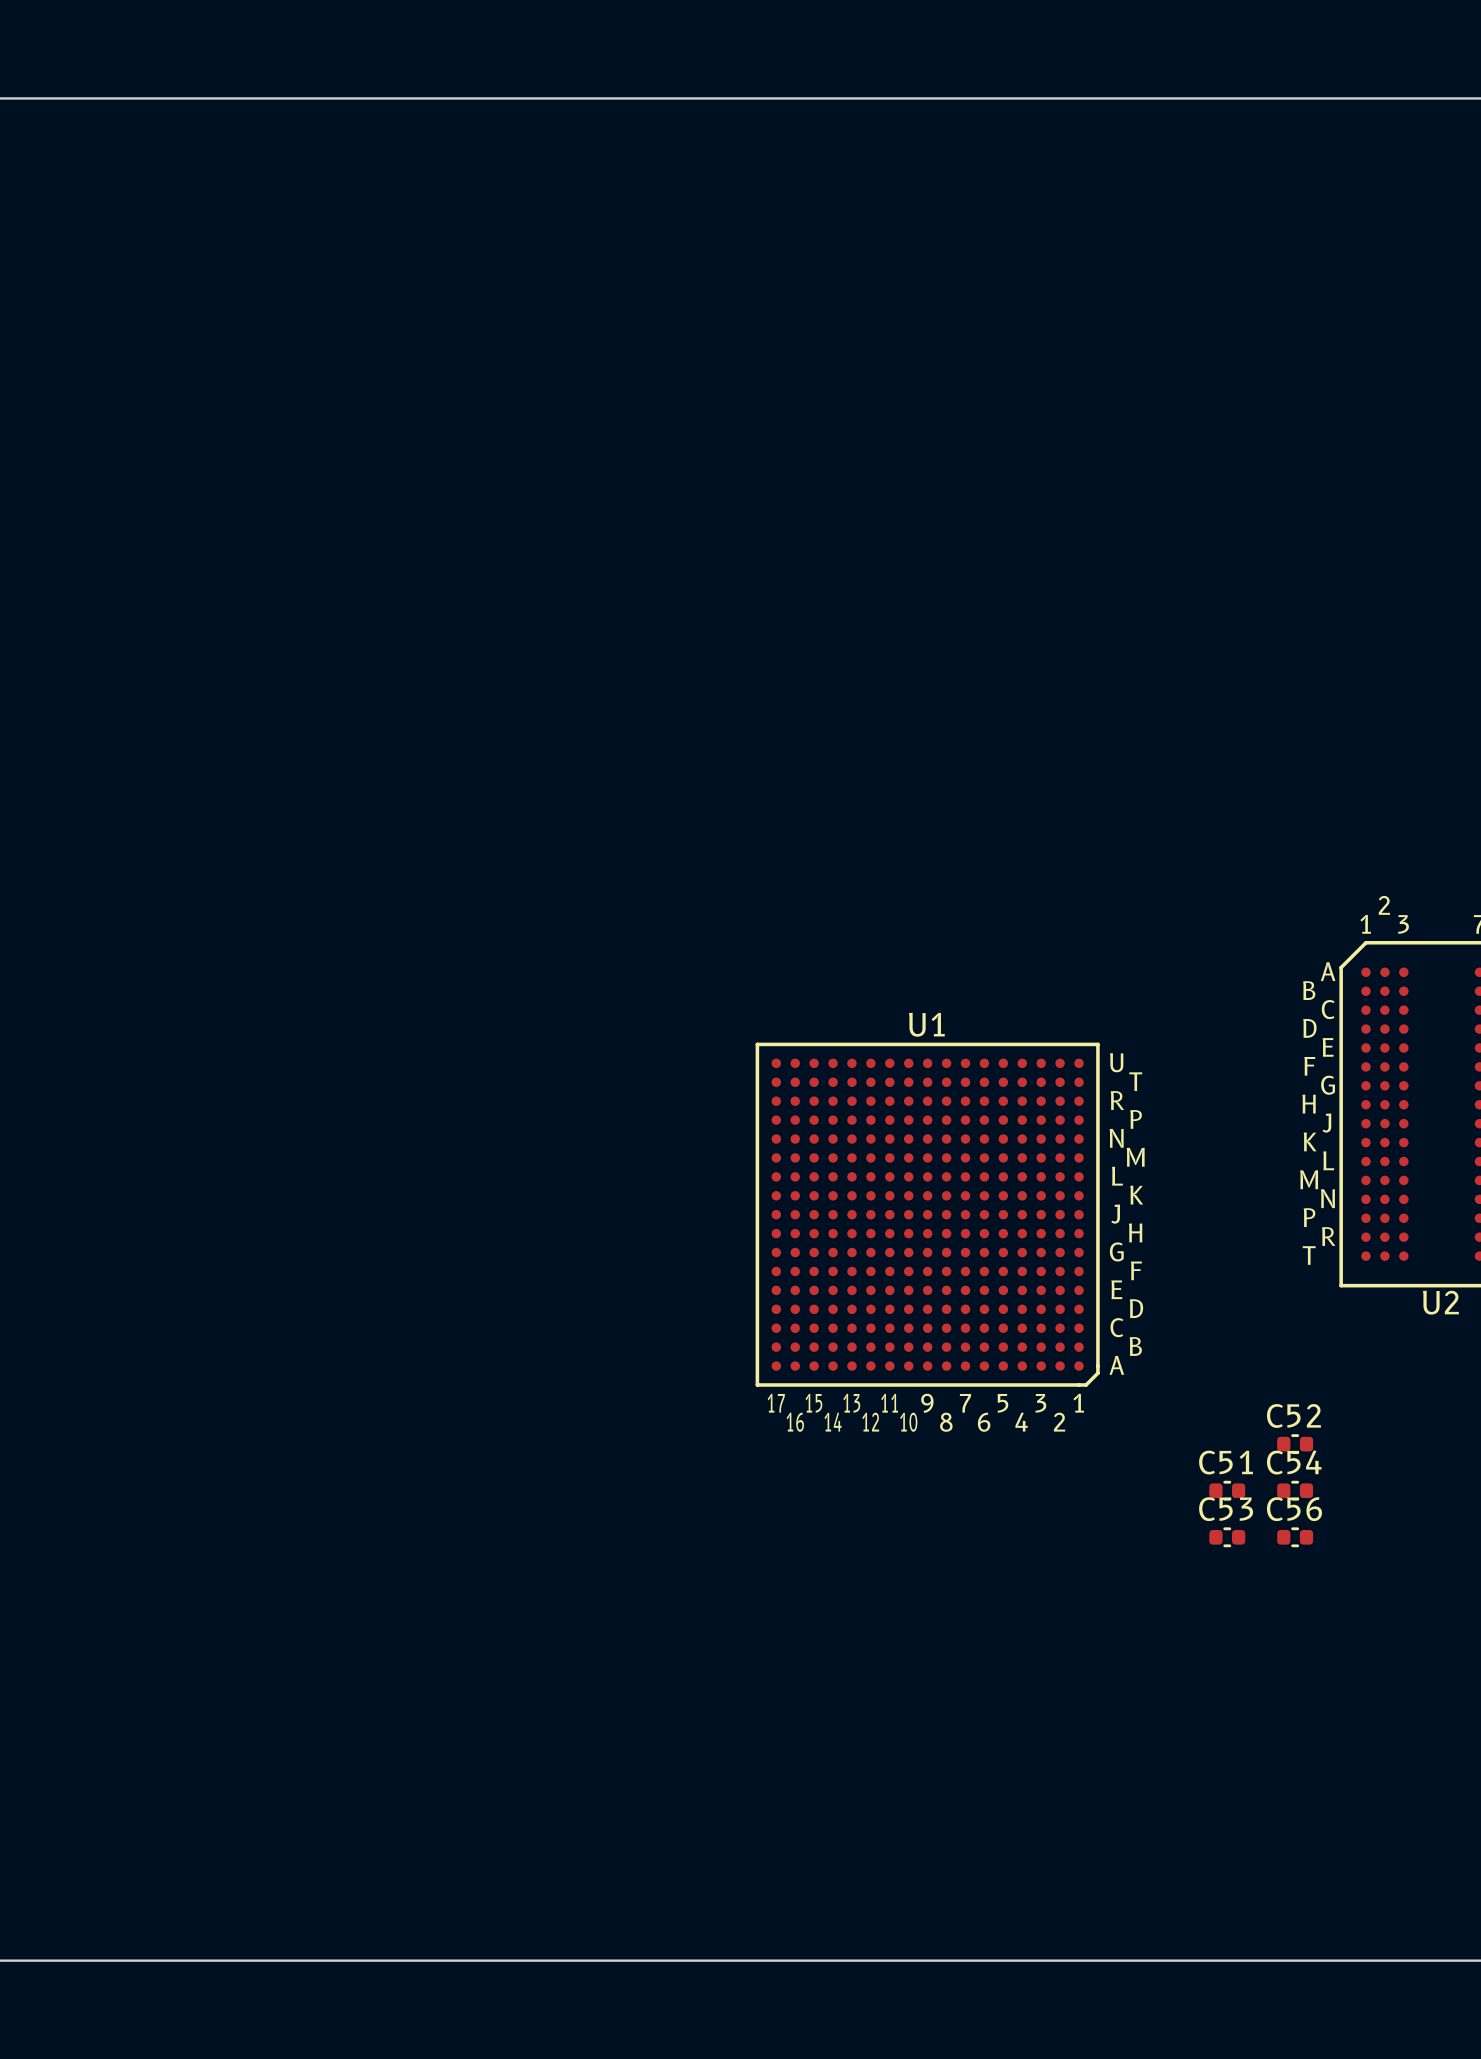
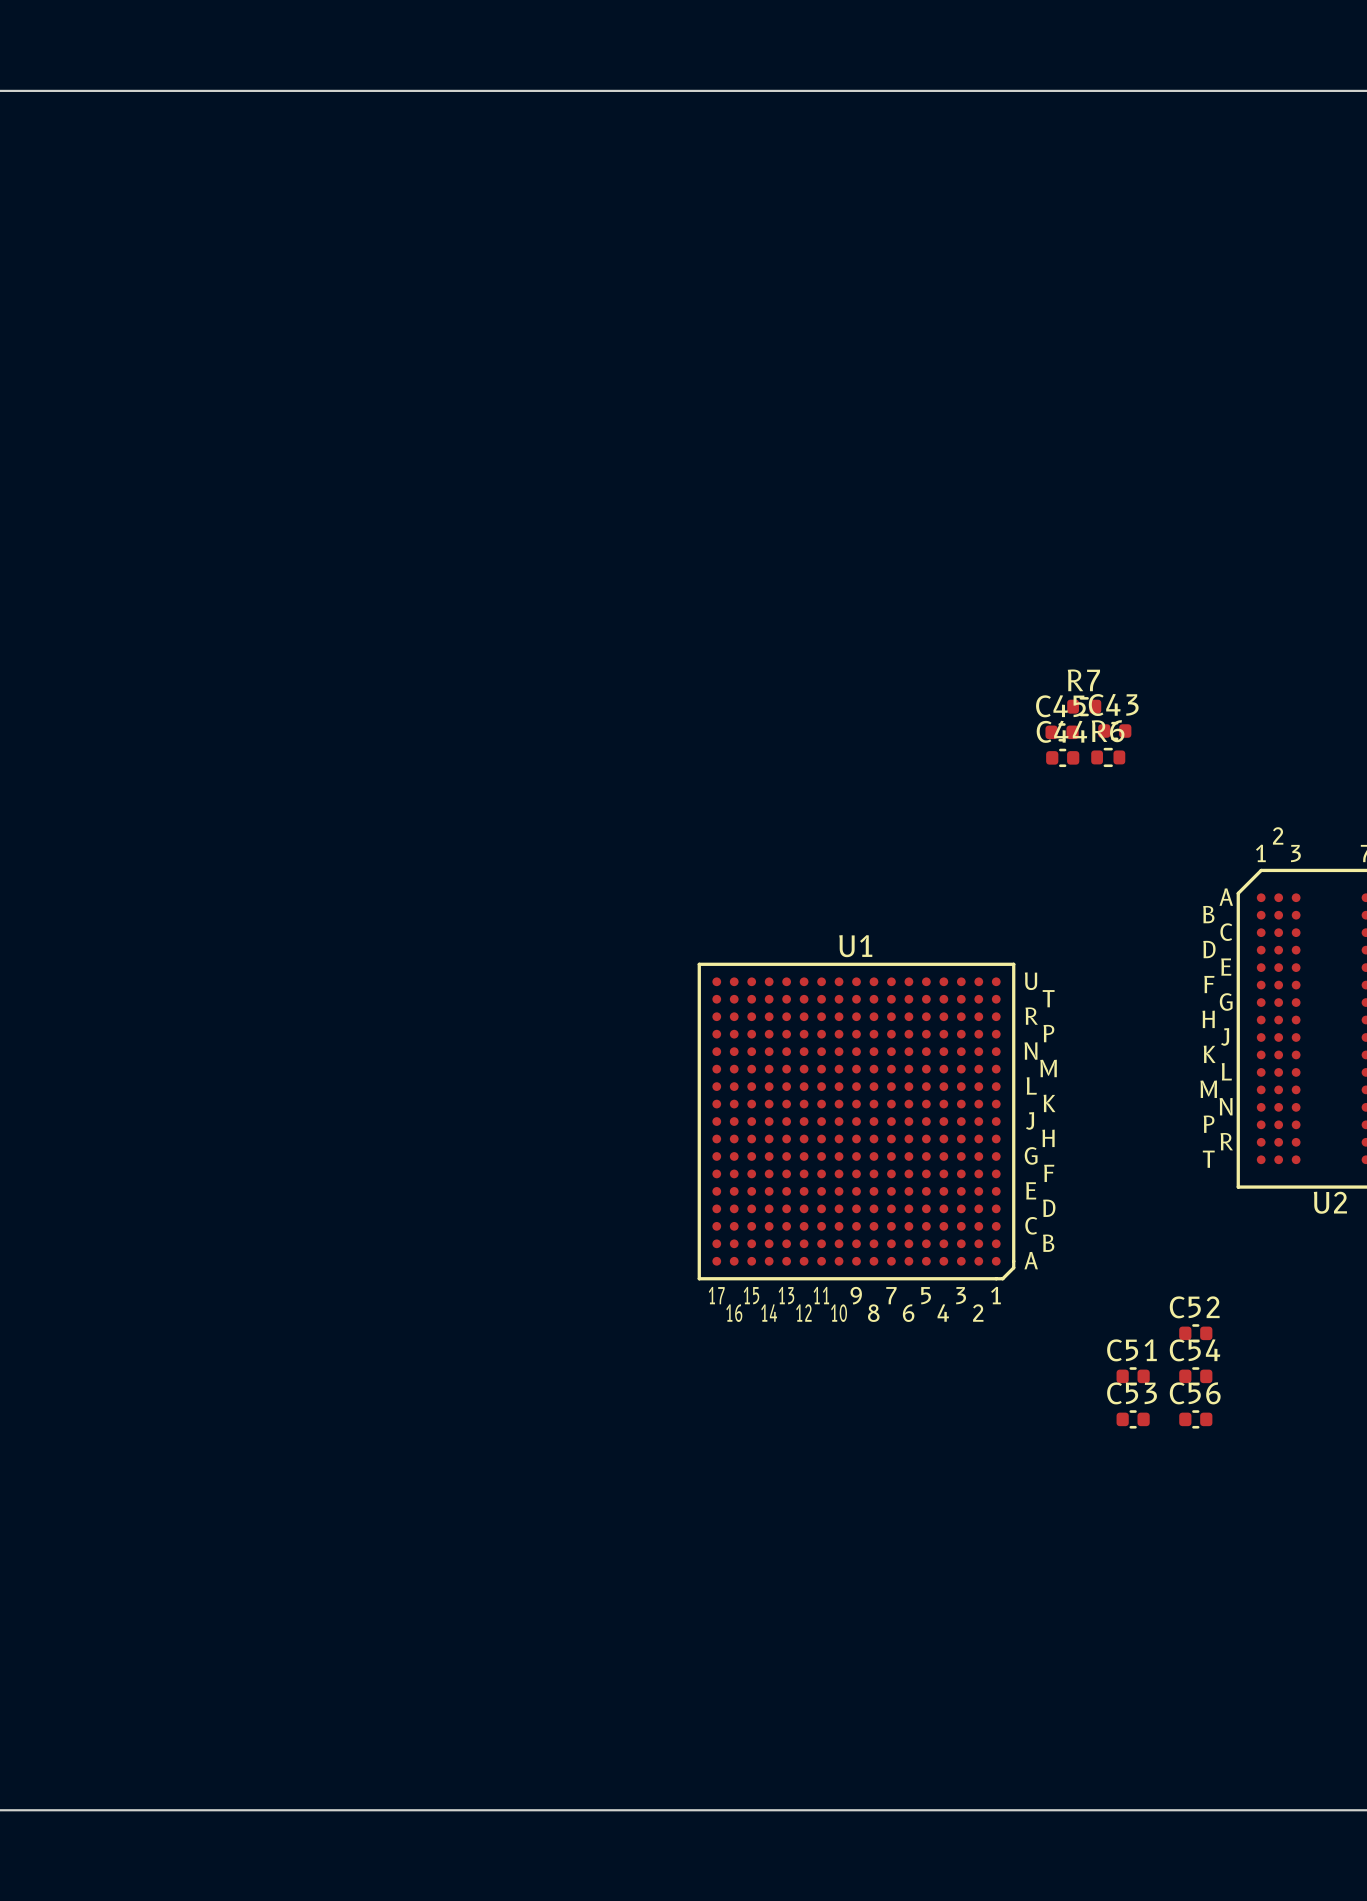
R7: none -> (1084, 706)
C43: none -> (1114, 731)
C45: none -> (1062, 732)
C44: none -> (1062, 757)
R6: none -> (1108, 757)

